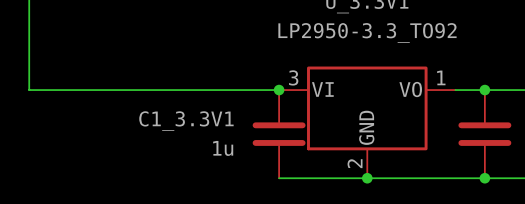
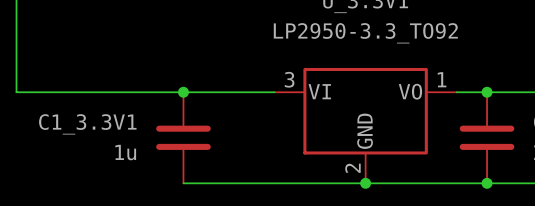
junction: none -> (183, 92)
junction: (279, 90) -> none
C1_3.3V1 position: (279, 134) -> (183, 137)
wire: none -> (183, 183) (274, 183)

